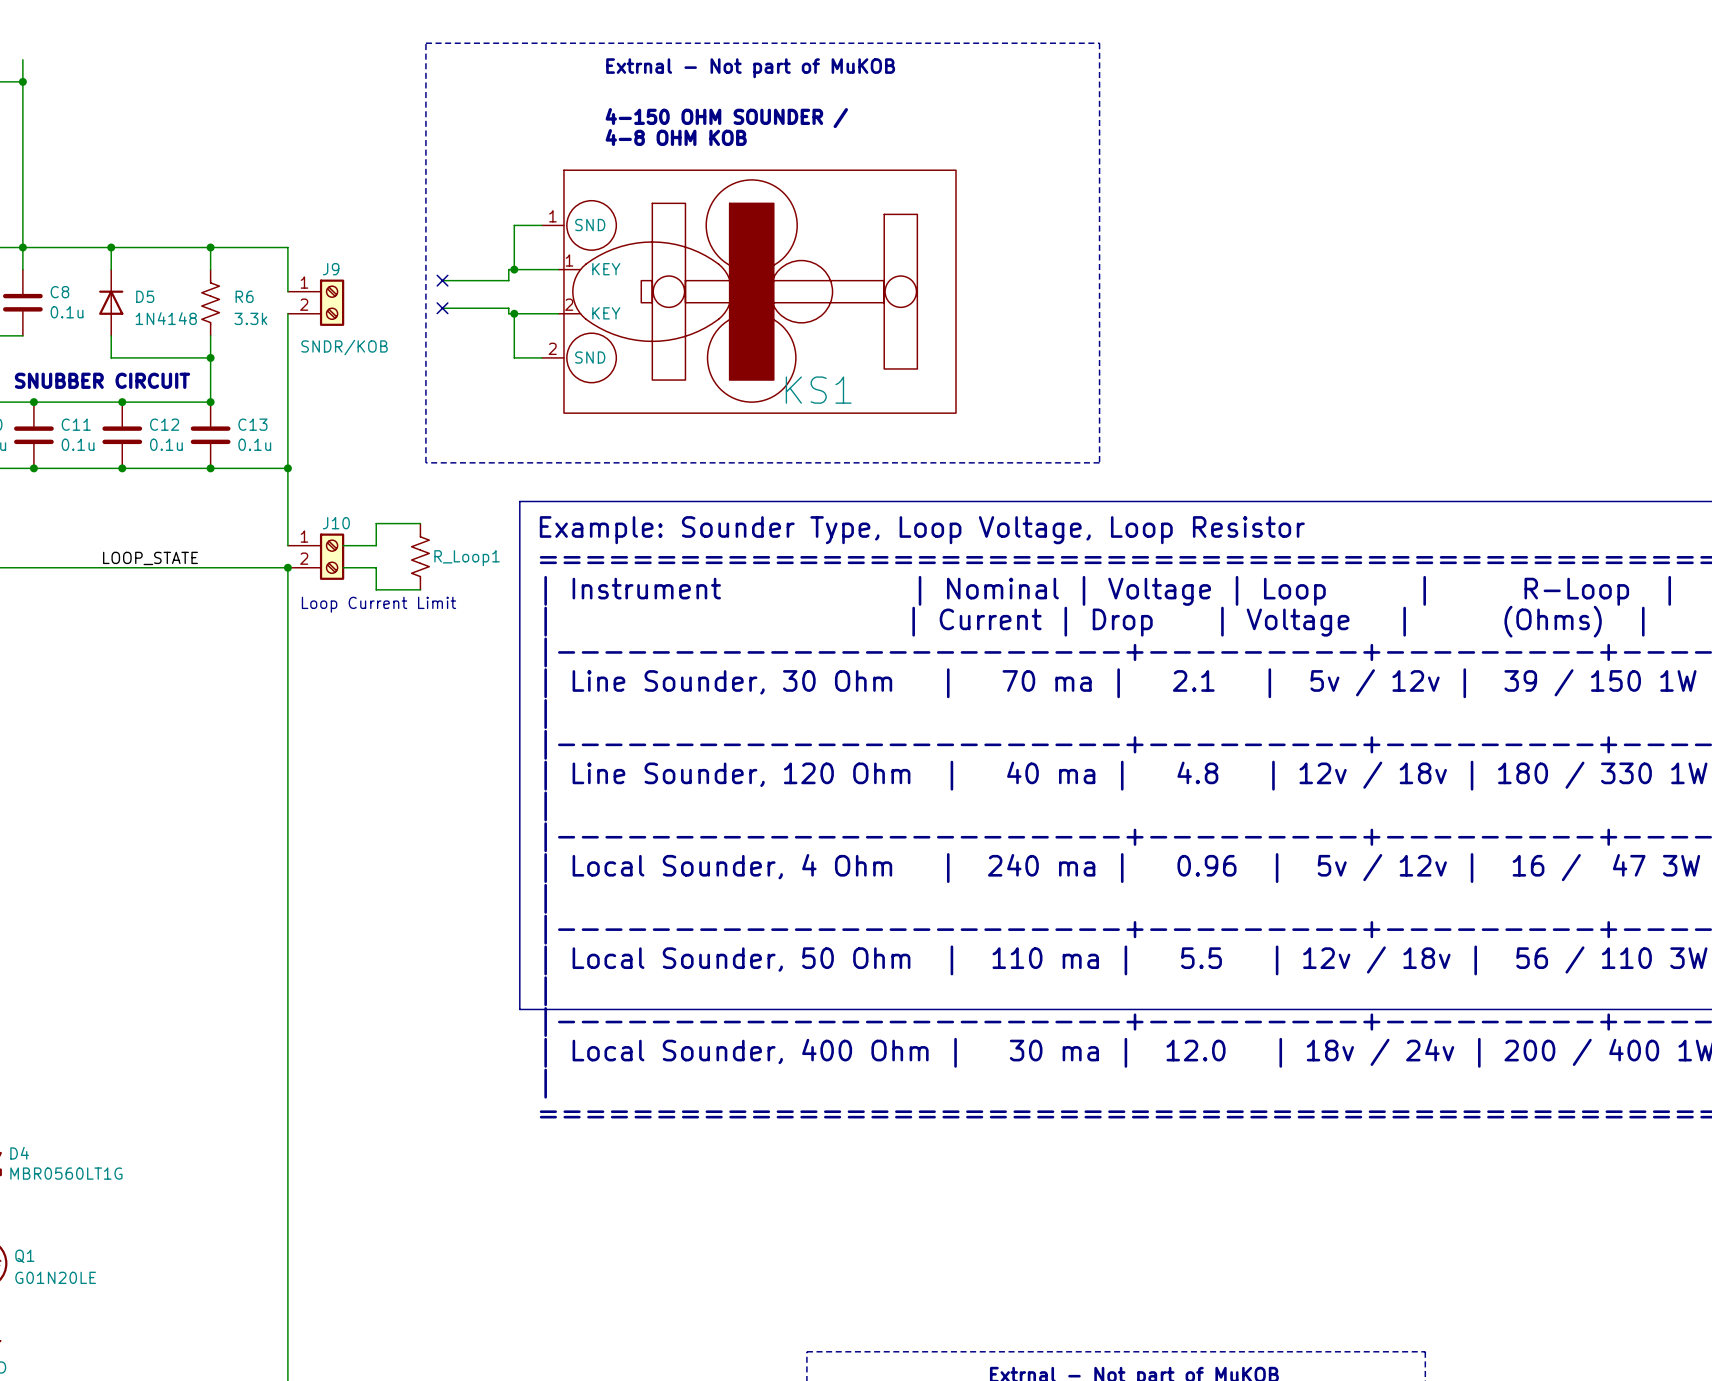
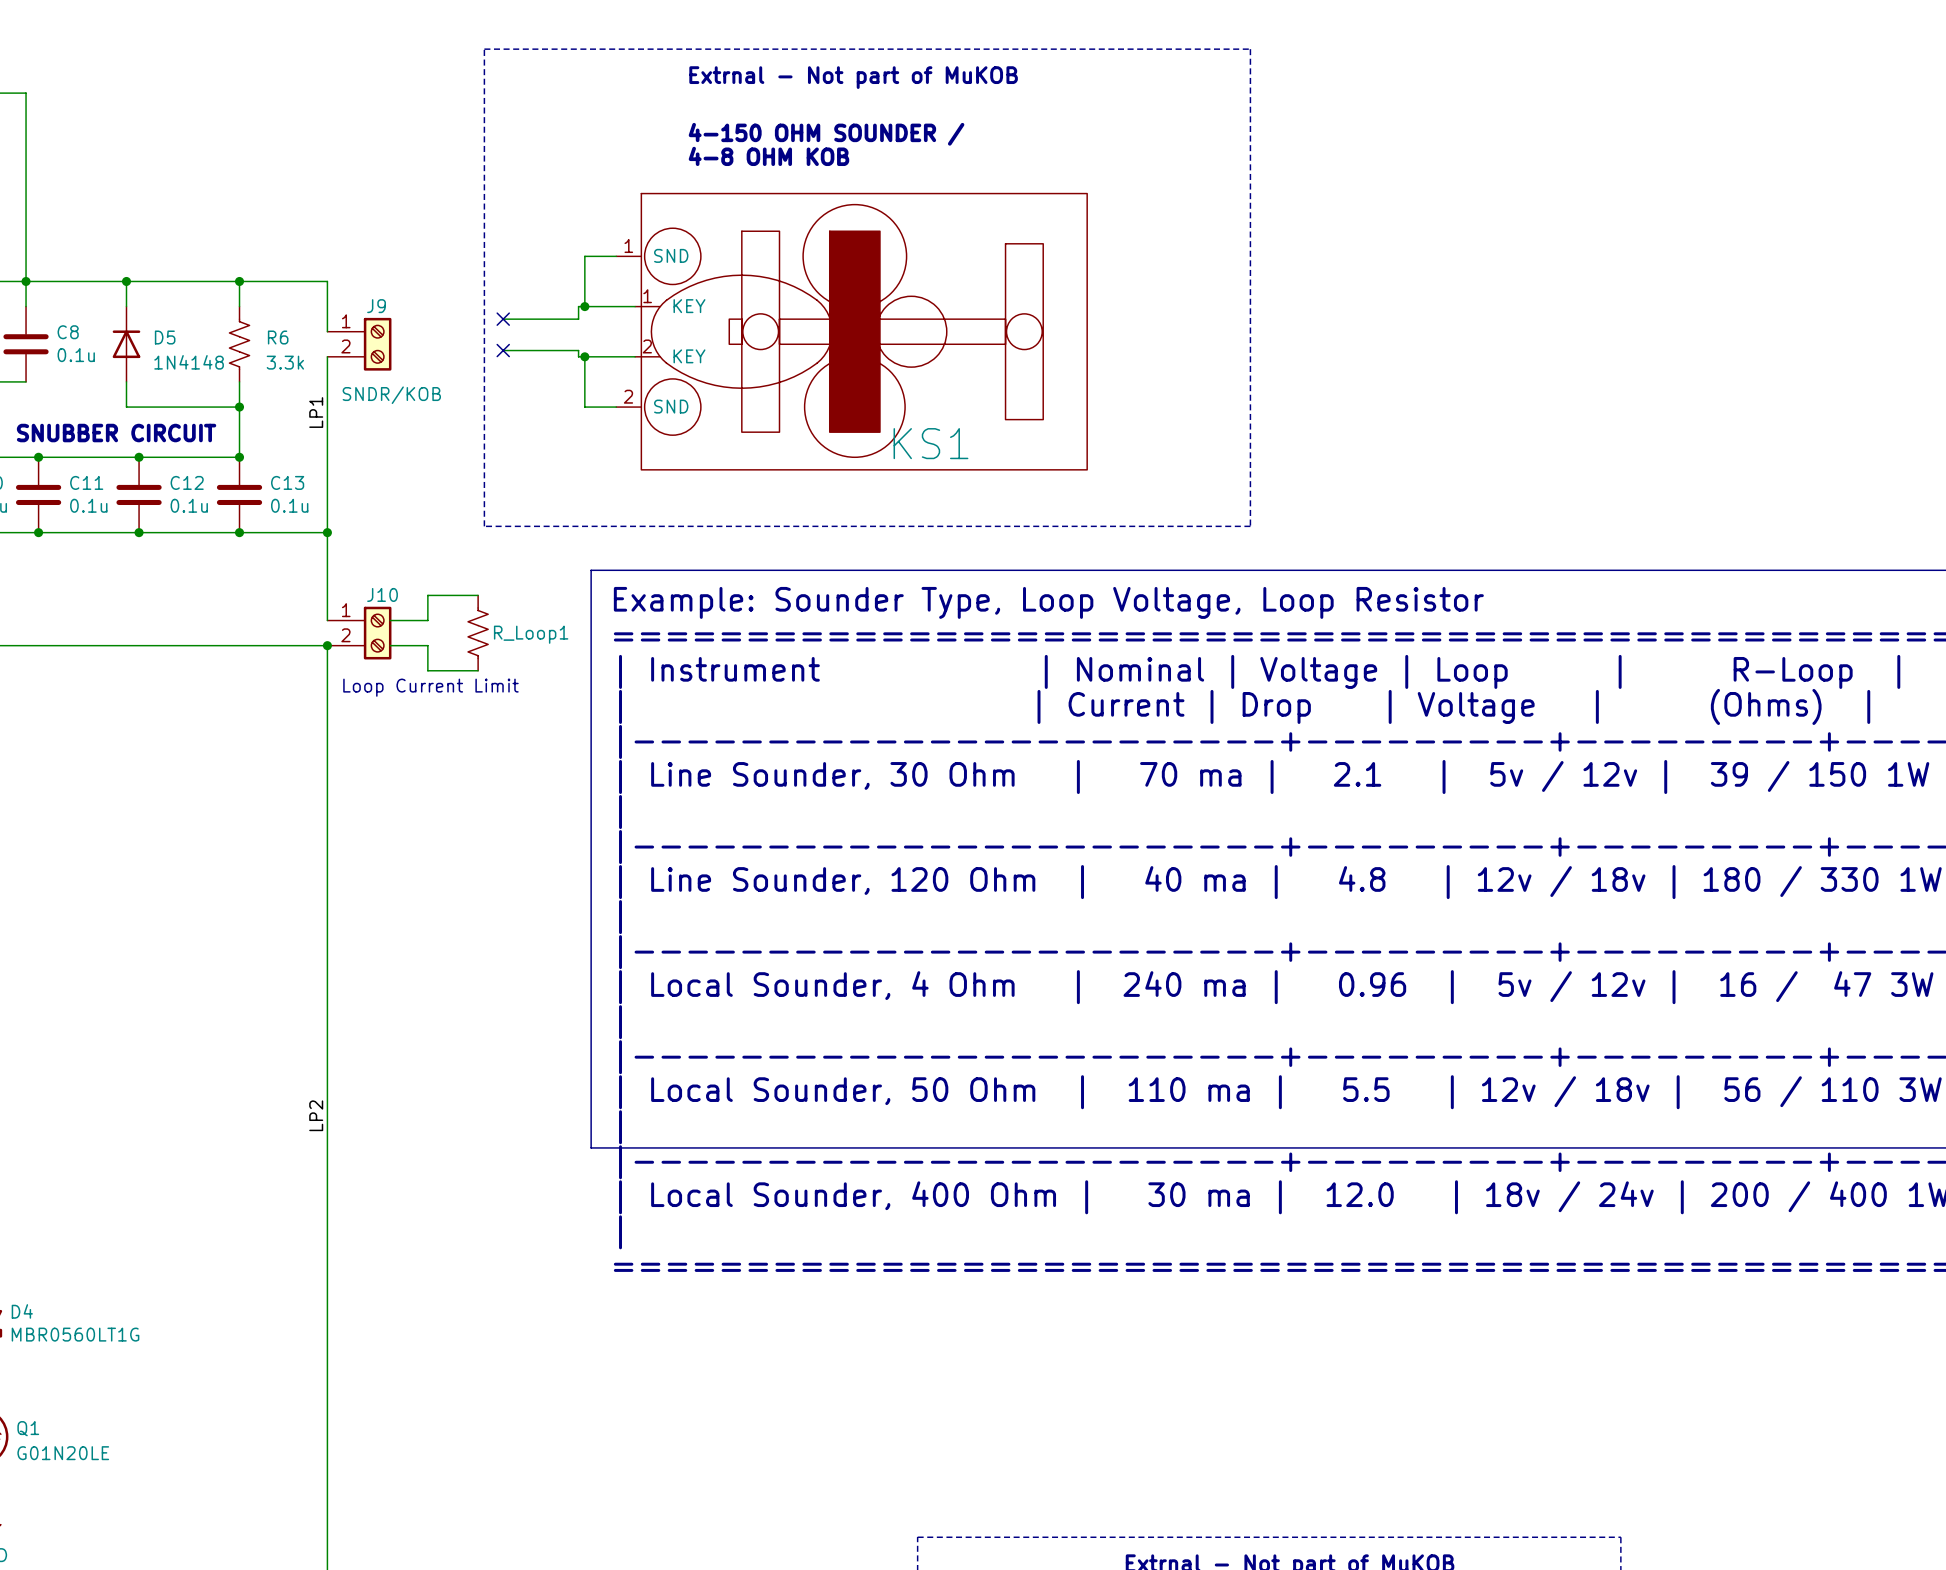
wire: (22, 59) (22, 81) -> none
junction: (22, 81) -> none
label: none -> LP1 (316, 412)
label: LOOP_STATE (150, 558) -> none
label: none -> LP2 (316, 1115)

